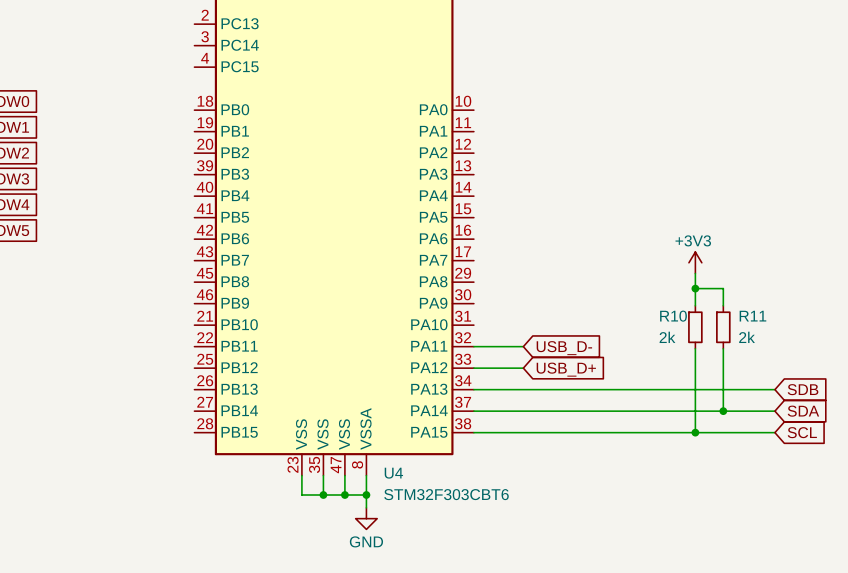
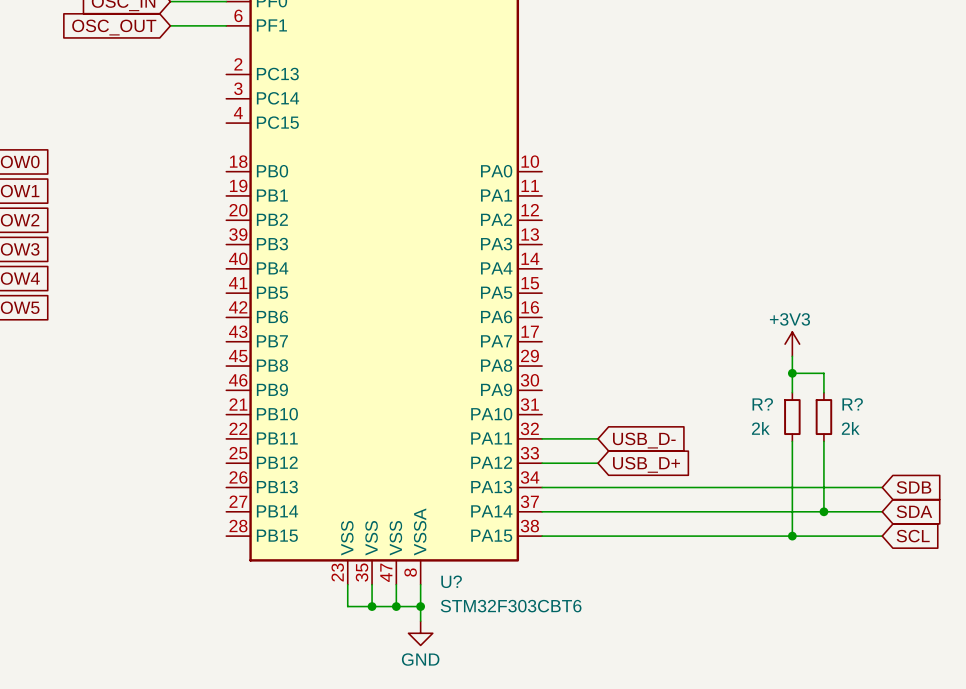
R10 name: R10 (673, 316) -> R? (762, 404)
R11 name: R11 (752, 316) -> R? (852, 404)
U4 name: U4 (393, 473) -> U? (451, 581)

